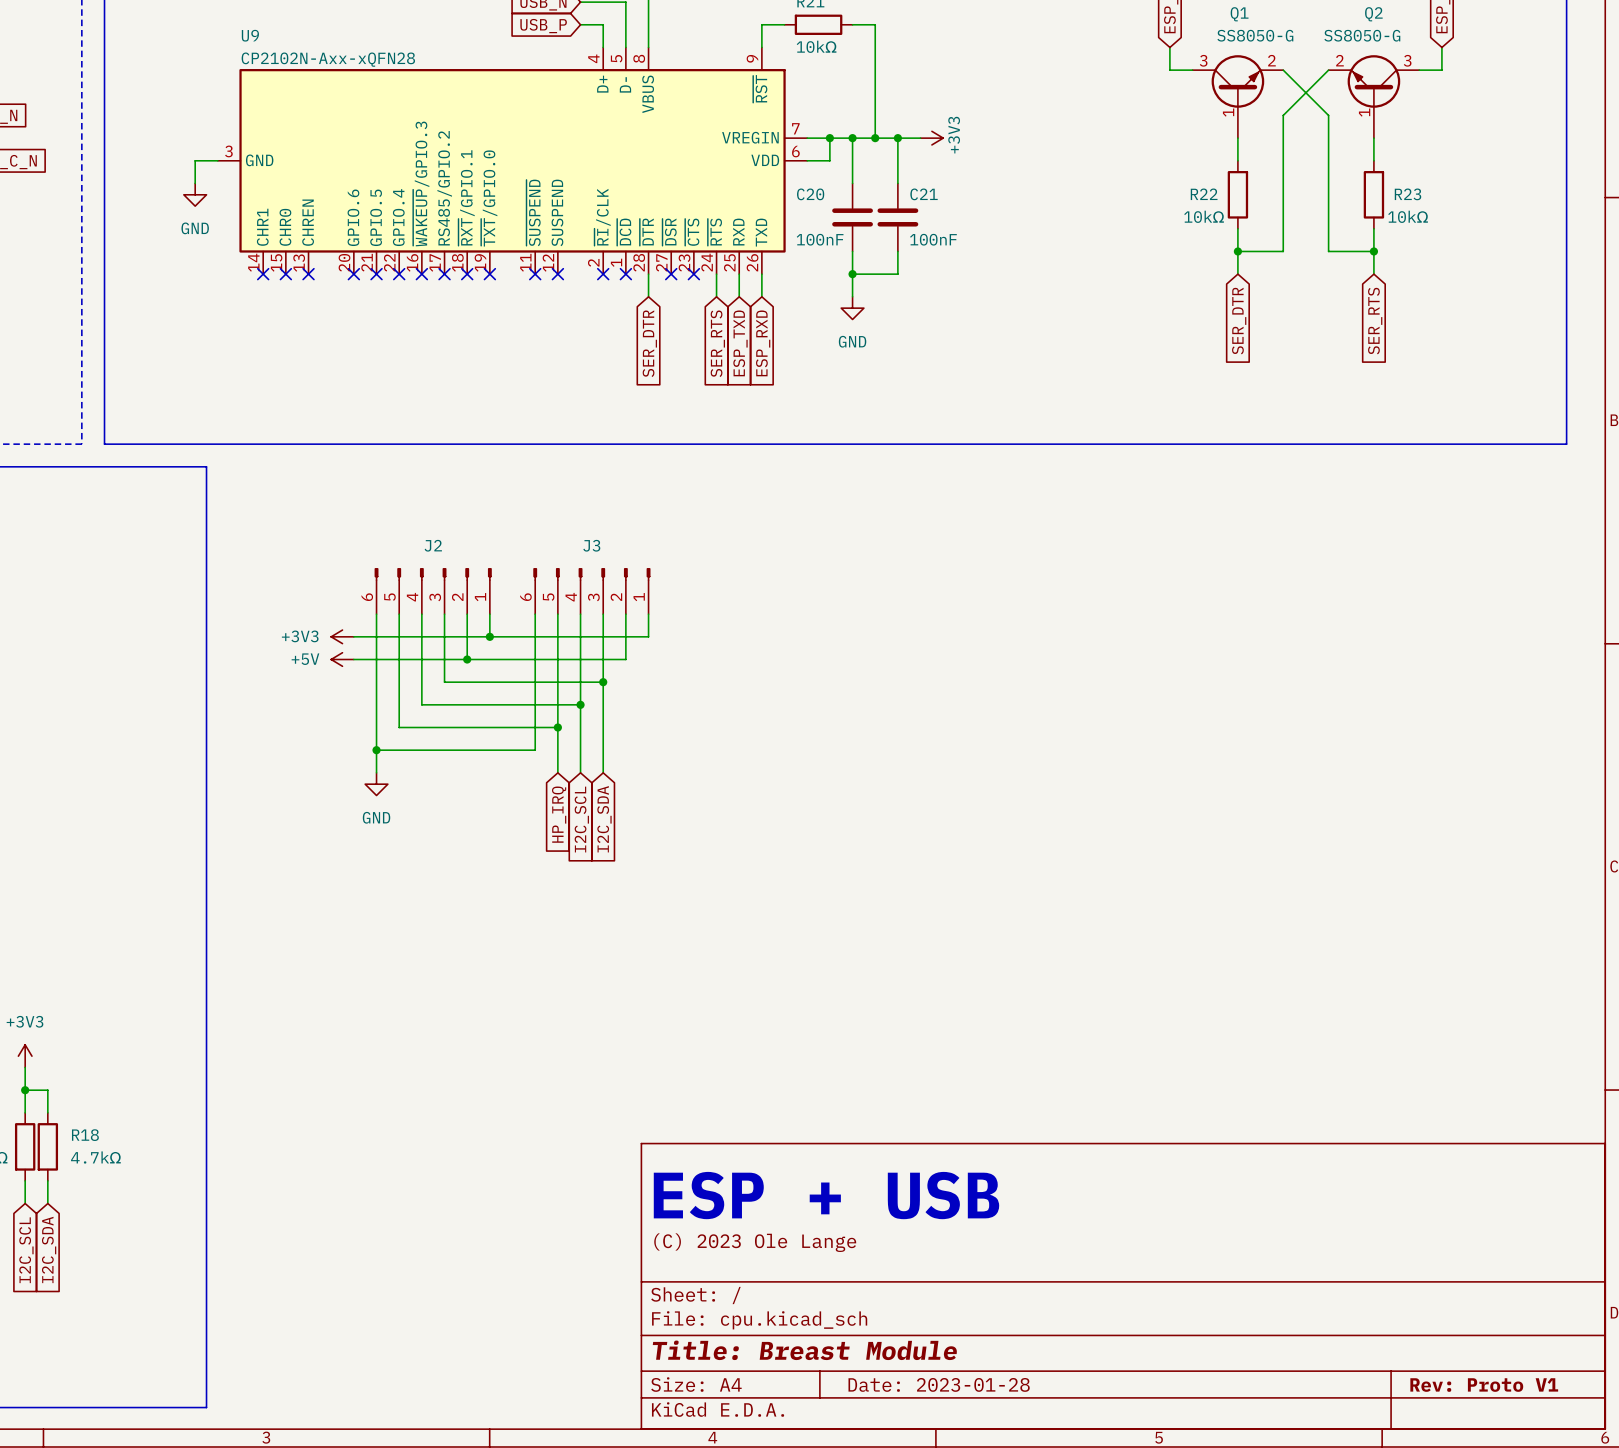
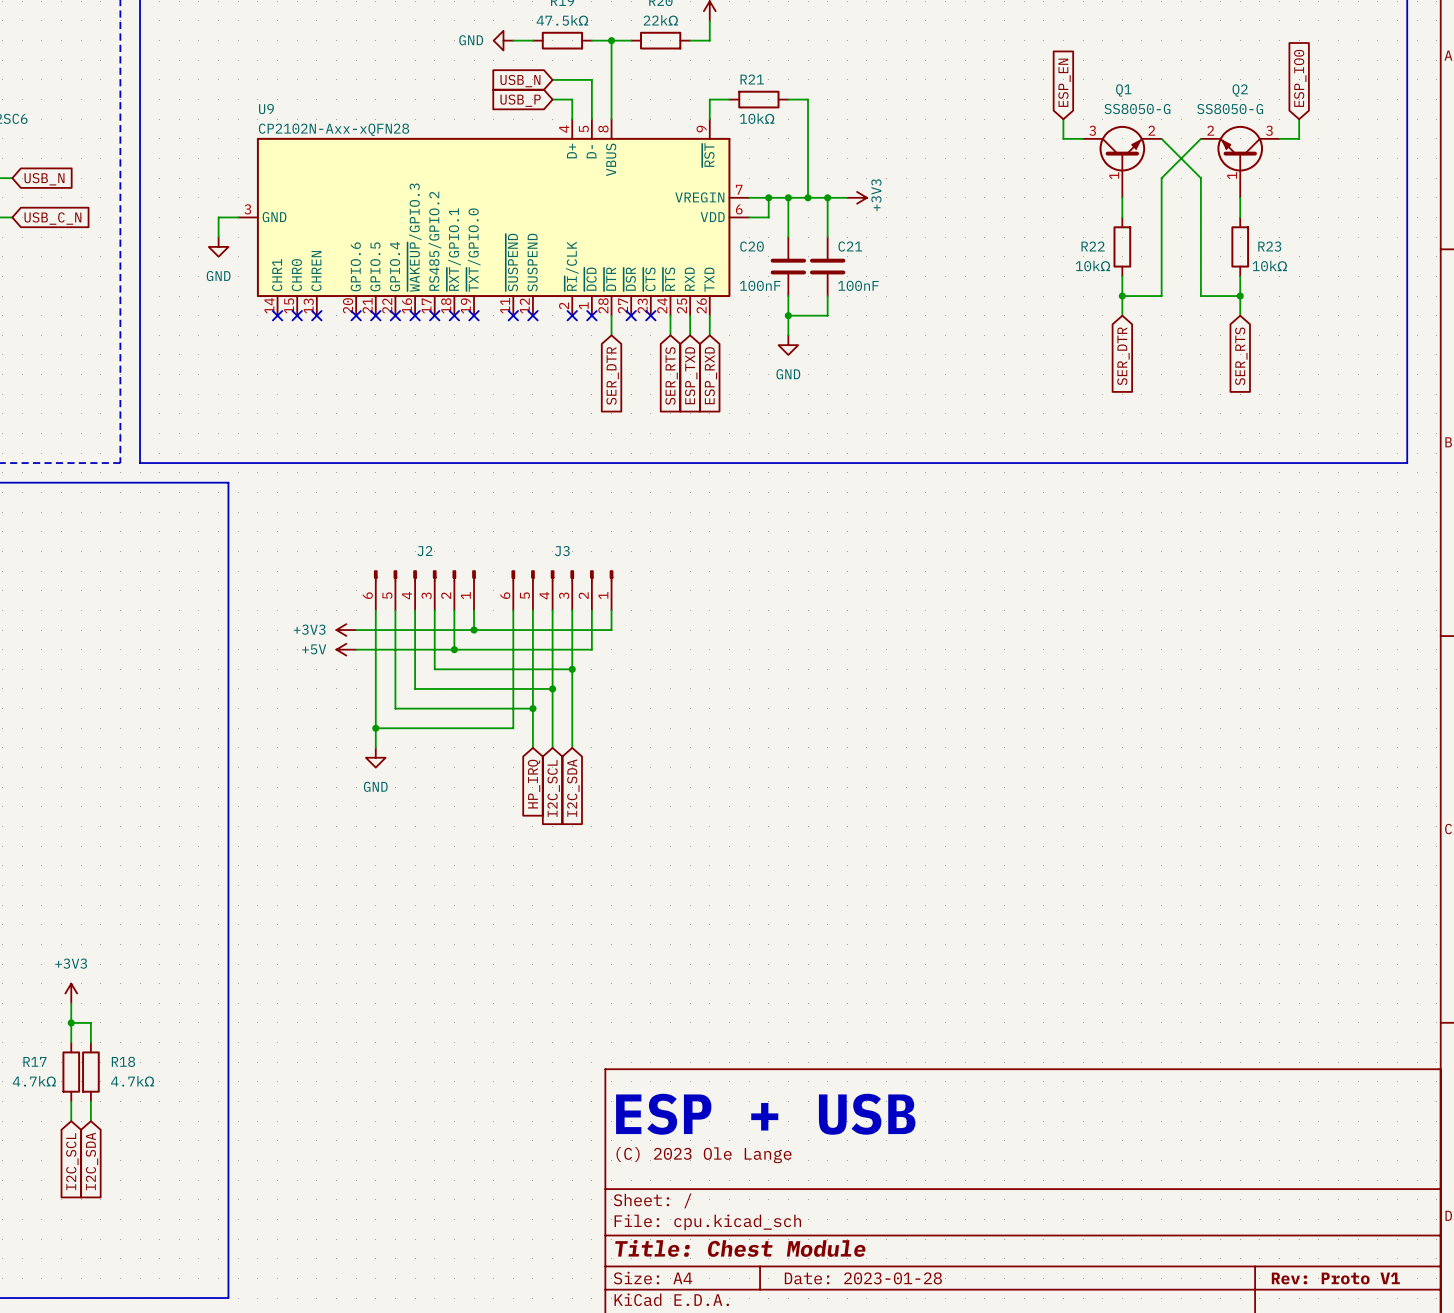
title block: Title: Breast Module (804, 1350) -> Title: Chest Module (740, 1248)

